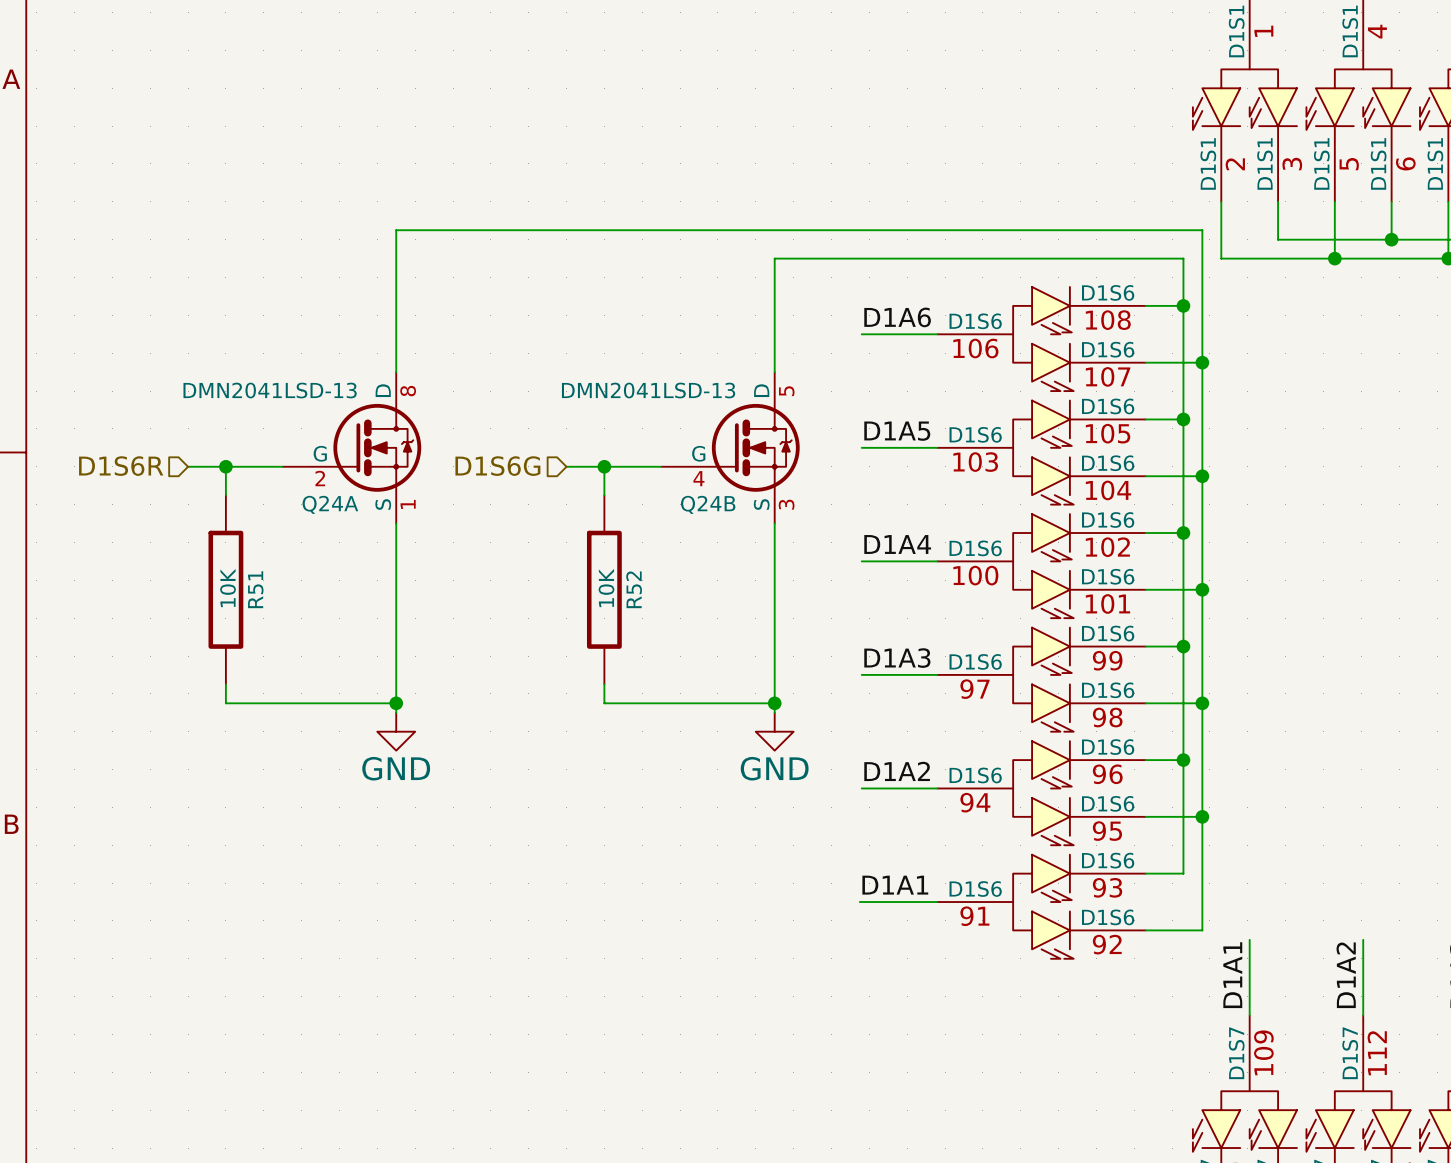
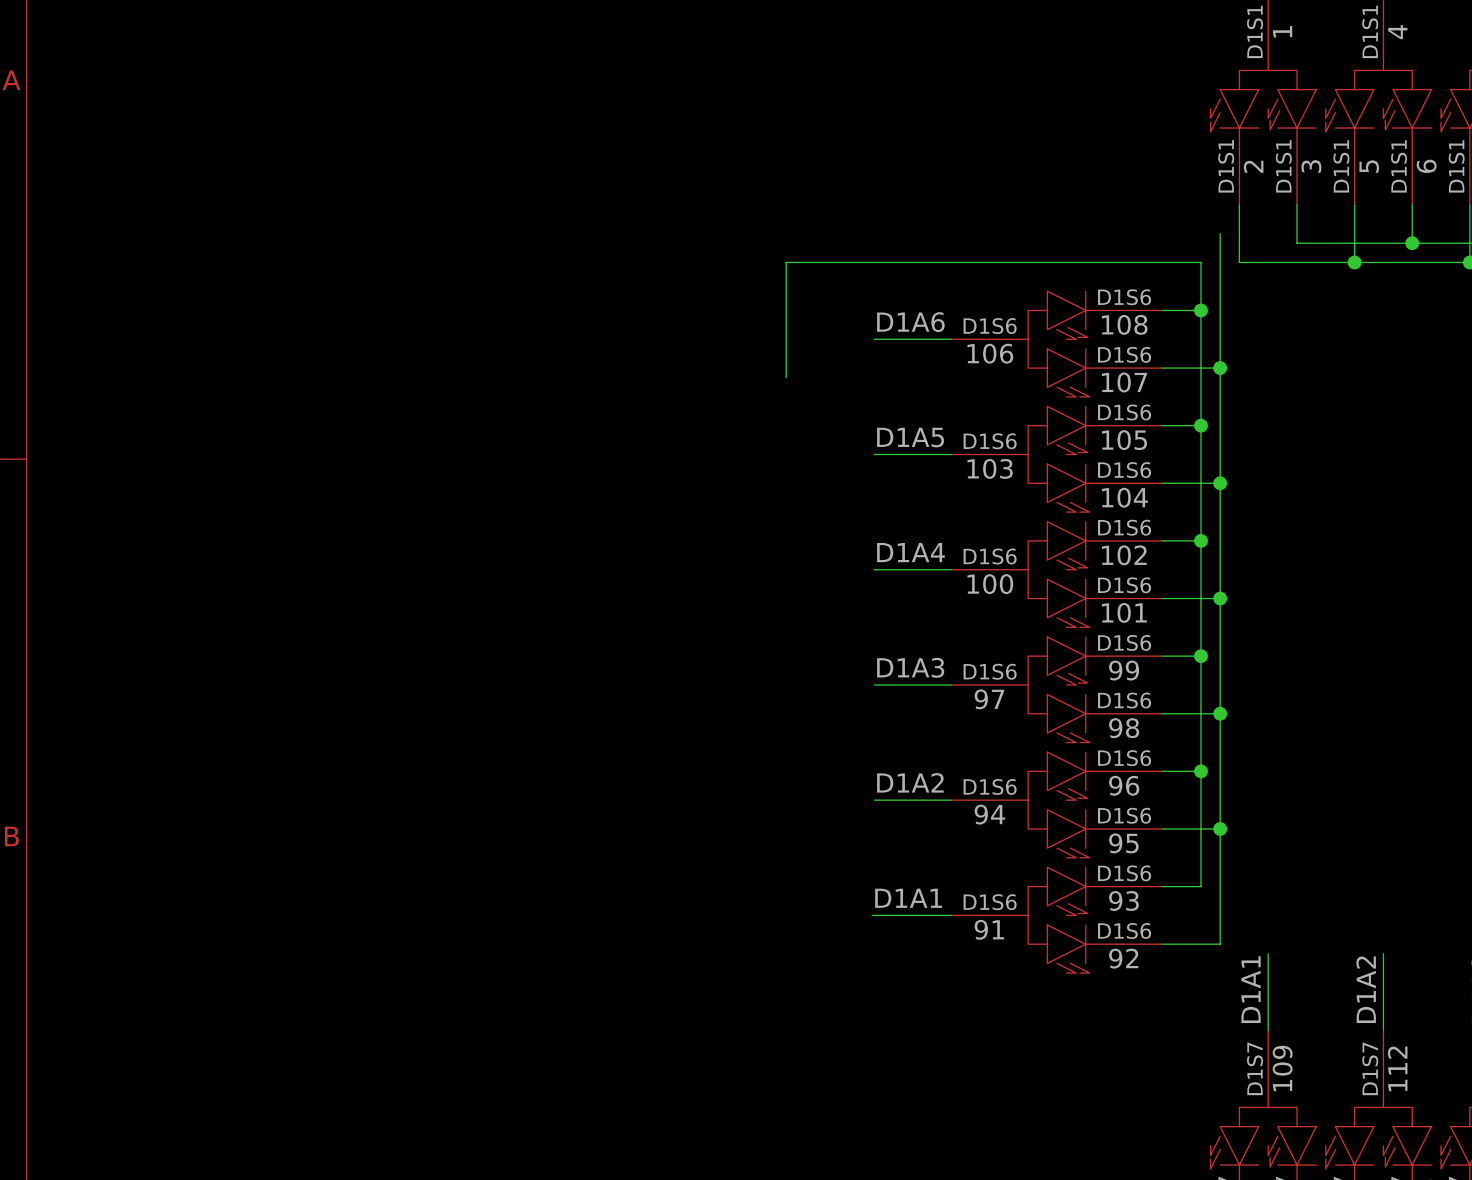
wire: (1202, 230) (396, 230) (396, 372) -> none
Q24A: DMN2041LSD-13 (351, 447) -> none
Q24B: DMN2041LSD-13 (730, 447) -> none
hierarchical label: D1S6R (121, 466) -> none
wire: (188, 466) (282, 466) -> none
wire: (225, 466) (225, 495) -> none
junction: (225, 466) -> none
hierarchical label: D1S6G (497, 466) -> none
wire: (566, 466) (661, 466) -> none
wire: (604, 466) (604, 495) -> none
junction: (604, 466) -> none
wire: (396, 523) (396, 712) -> none
wire: (774, 523) (774, 712) -> none
R51: 10K (225, 589) -> none
R52: 10K (604, 589) -> none
wire: (225, 684) (225, 703) (396, 703) -> none
wire: (604, 684) (604, 703) (774, 703) -> none
junction: (396, 703) -> none
junction: (774, 703) -> none
power symbol: GND (396, 731) -> none
power symbol: GND (774, 731) -> none

